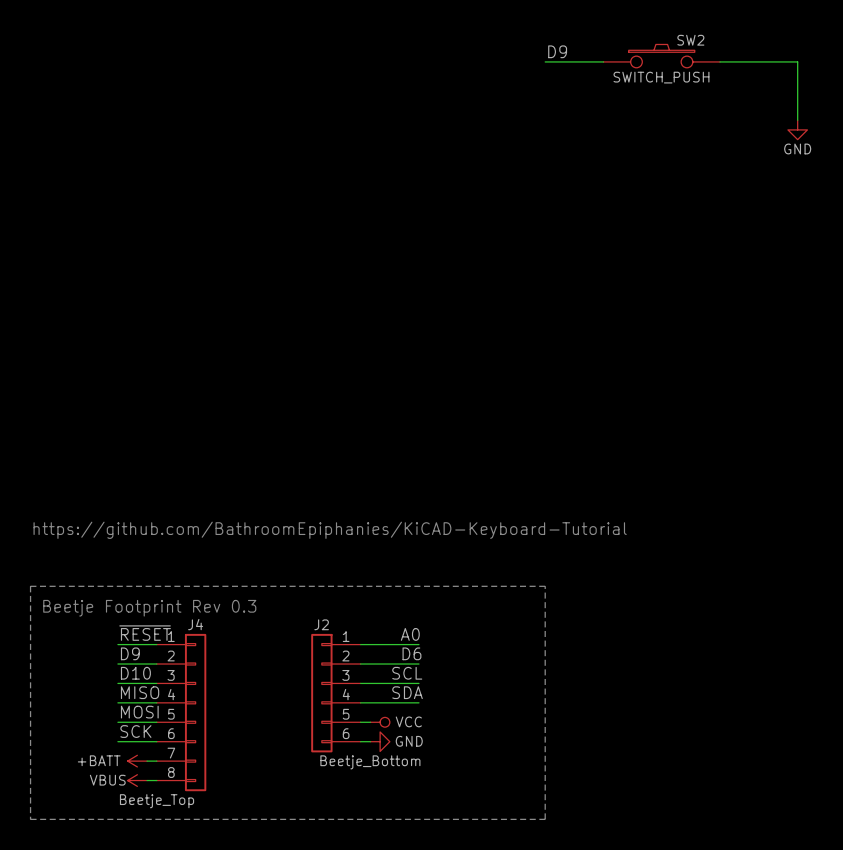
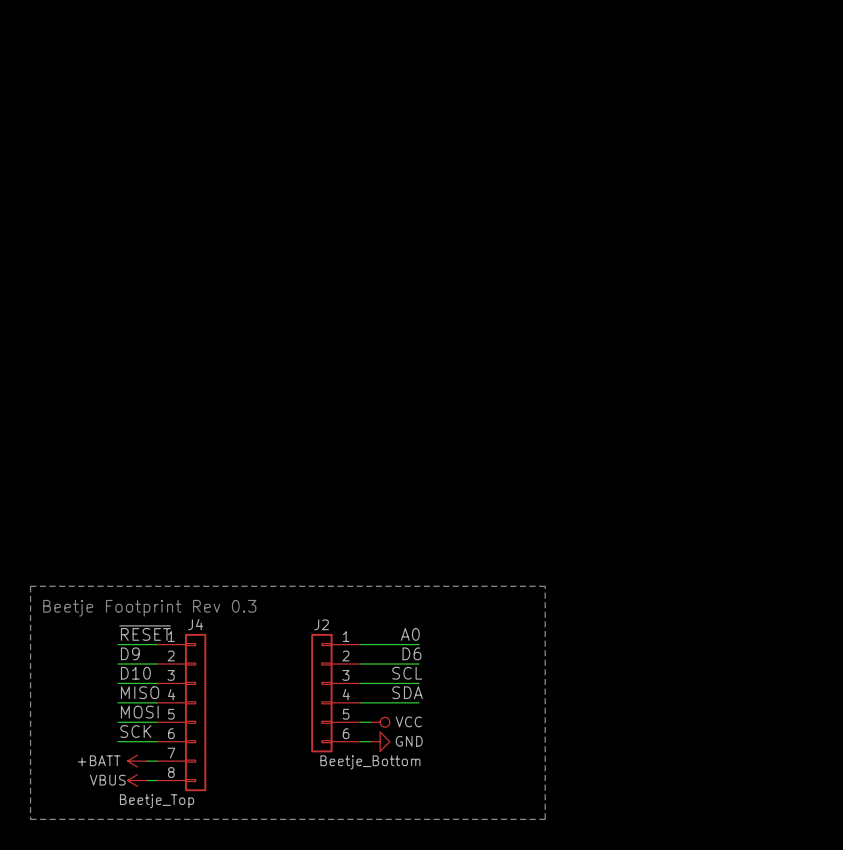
label: D9 (557, 51) -> none
SW2: SWITCH_PUSH (661, 56) -> none
wire: (545, 61) (603, 61) -> none
wire: (719, 61) (797, 61) (797, 120) -> none
power symbol: GND (797, 129) -> none
text: https://github.com/BathroomEpiphanies/KiCAD-Keyboard-Tutorial (330, 530) -> none

